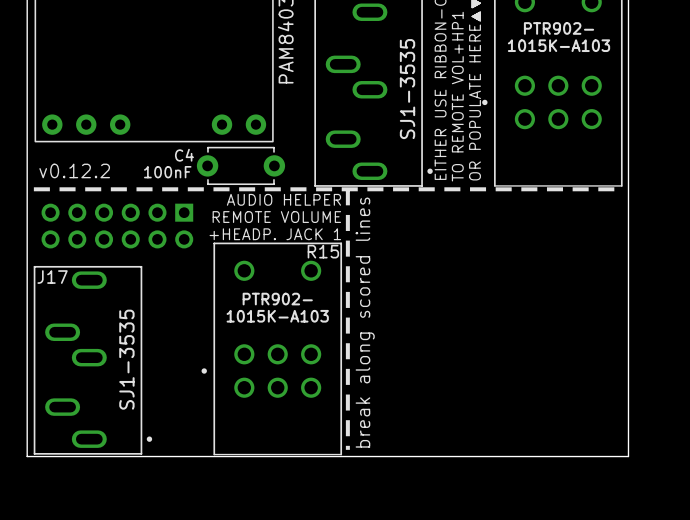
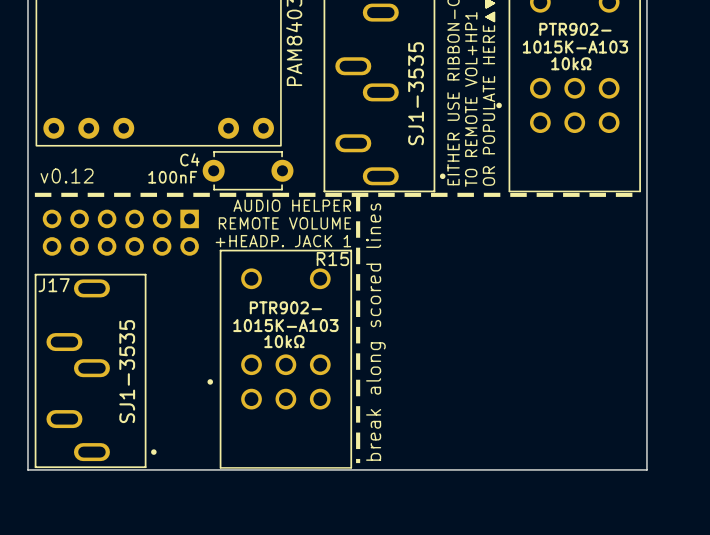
part value: none -> 10kΩ (571, 63)
text: SJ1-3535 (407, 89) -> none
part value: none -> SJ1-3535 (416, 93)
text: v0.12.2 (74, 170) -> v0.12 (67, 175)
R15 value: none -> 10kΩ (284, 341)
text: SJ1-3535 (126, 359) -> none
J17 value: none -> SJ1-3535 (127, 371)

